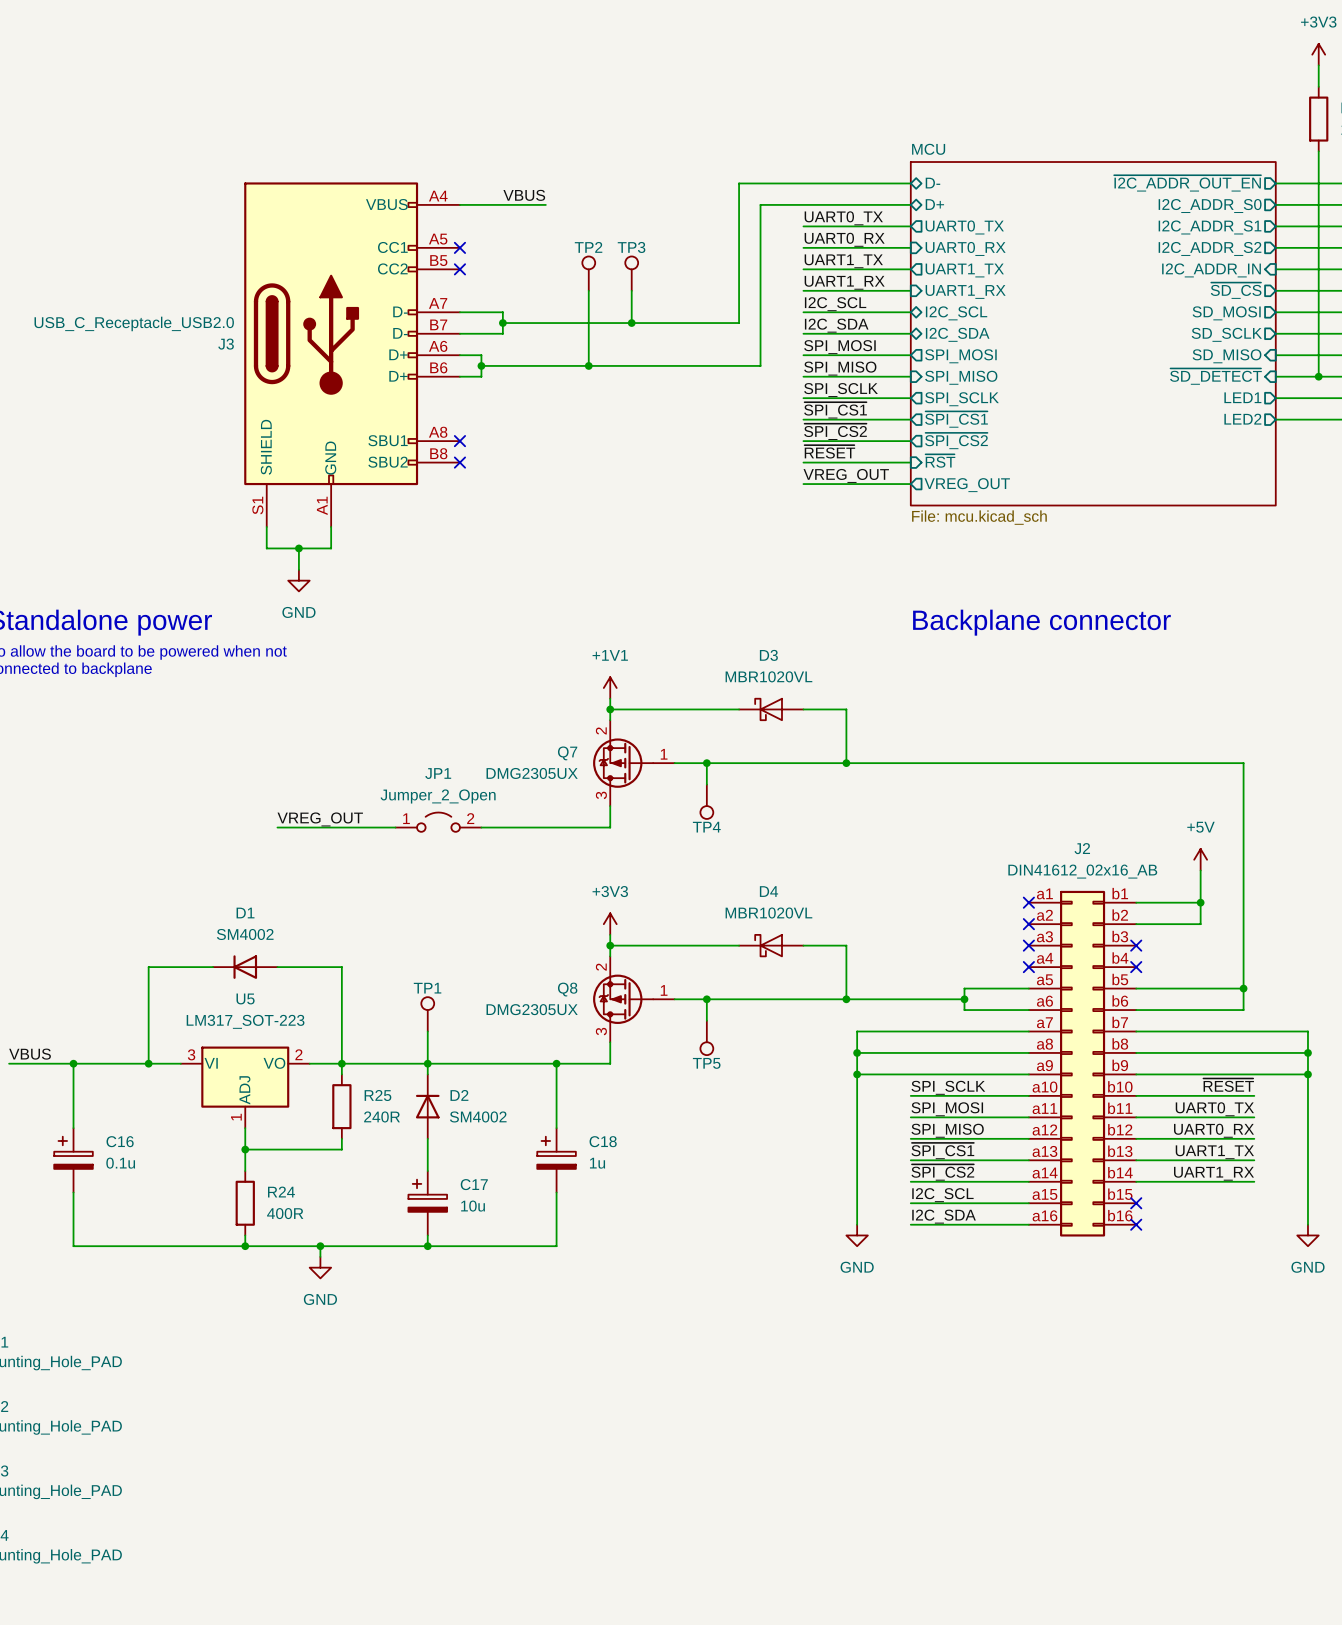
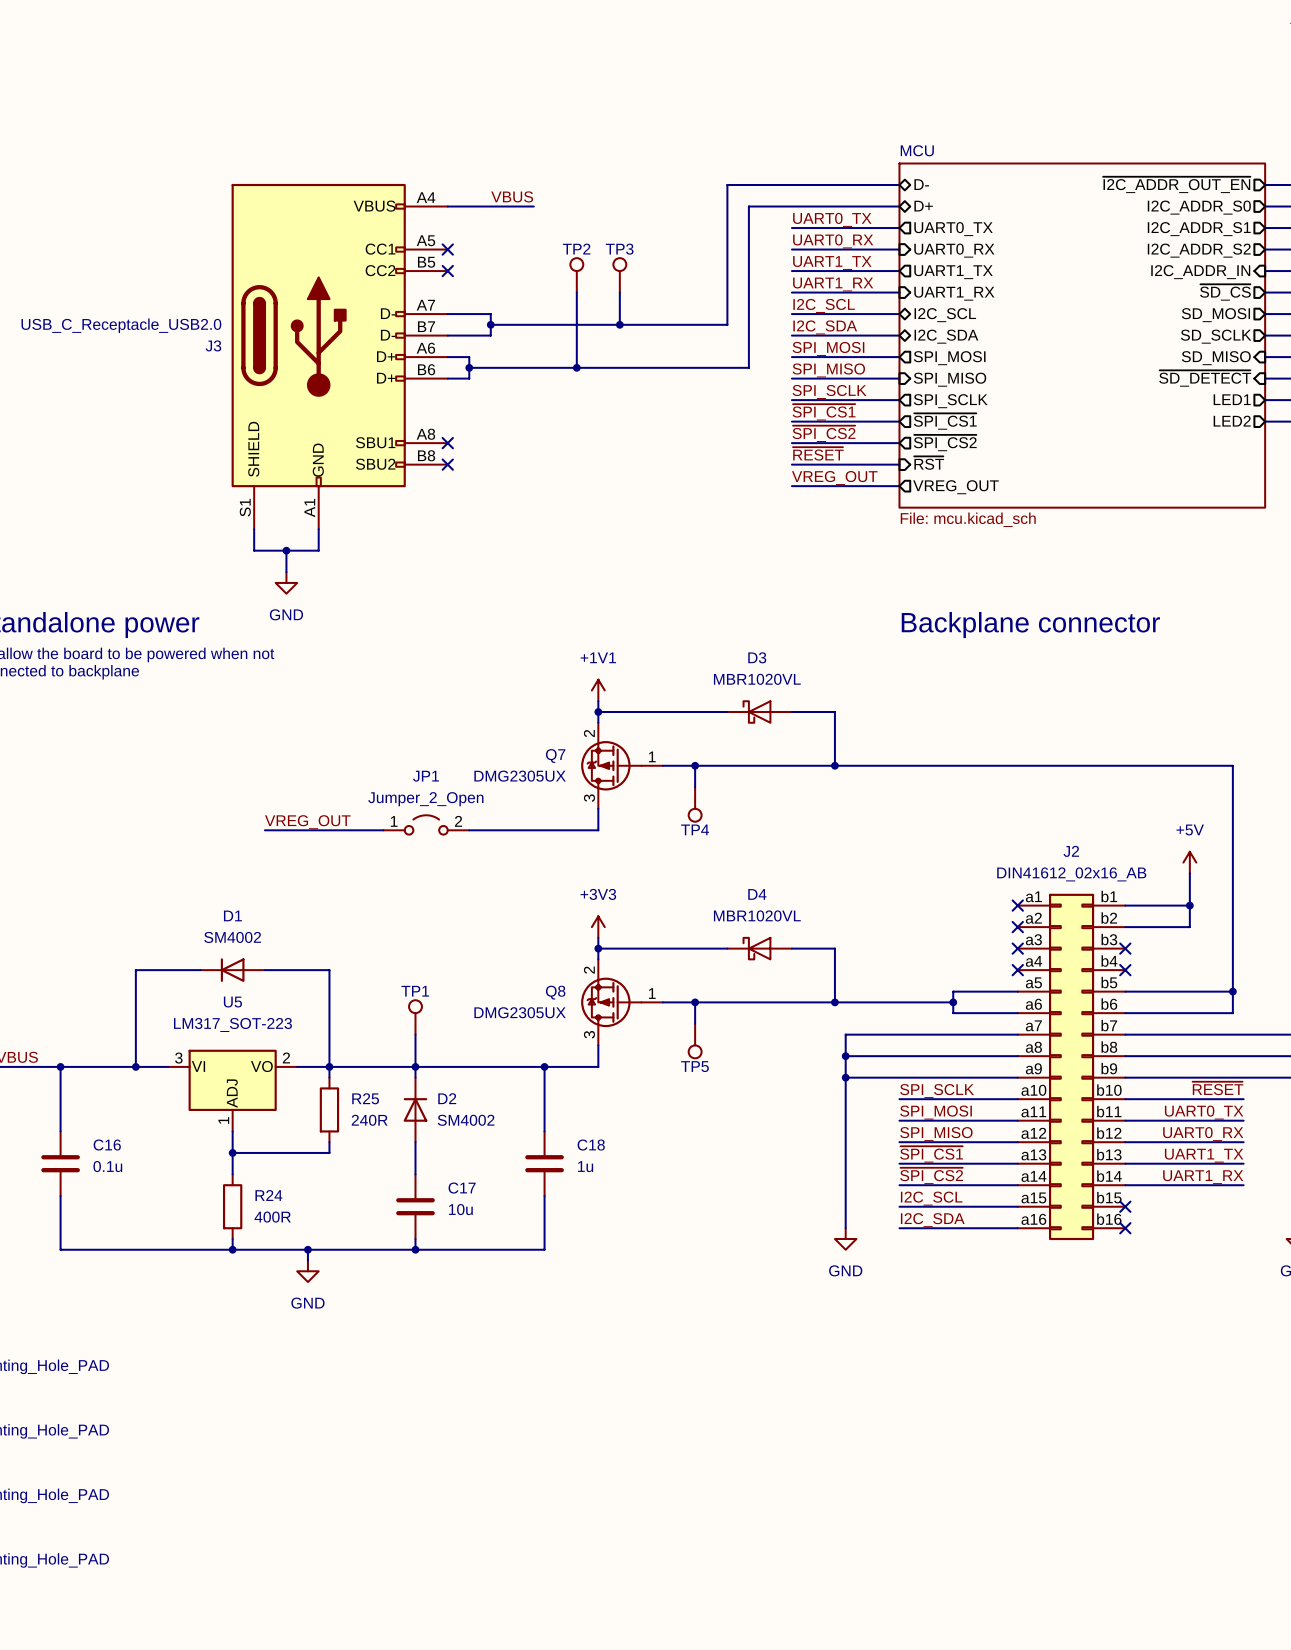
C16 symbol: [54, 1128, 93, 1193] -> [41, 1131, 80, 1196]
C18 symbol: [537, 1128, 576, 1193] -> [525, 1131, 564, 1196]
C17 symbol: [408, 1171, 448, 1236] -> [396, 1174, 435, 1240]

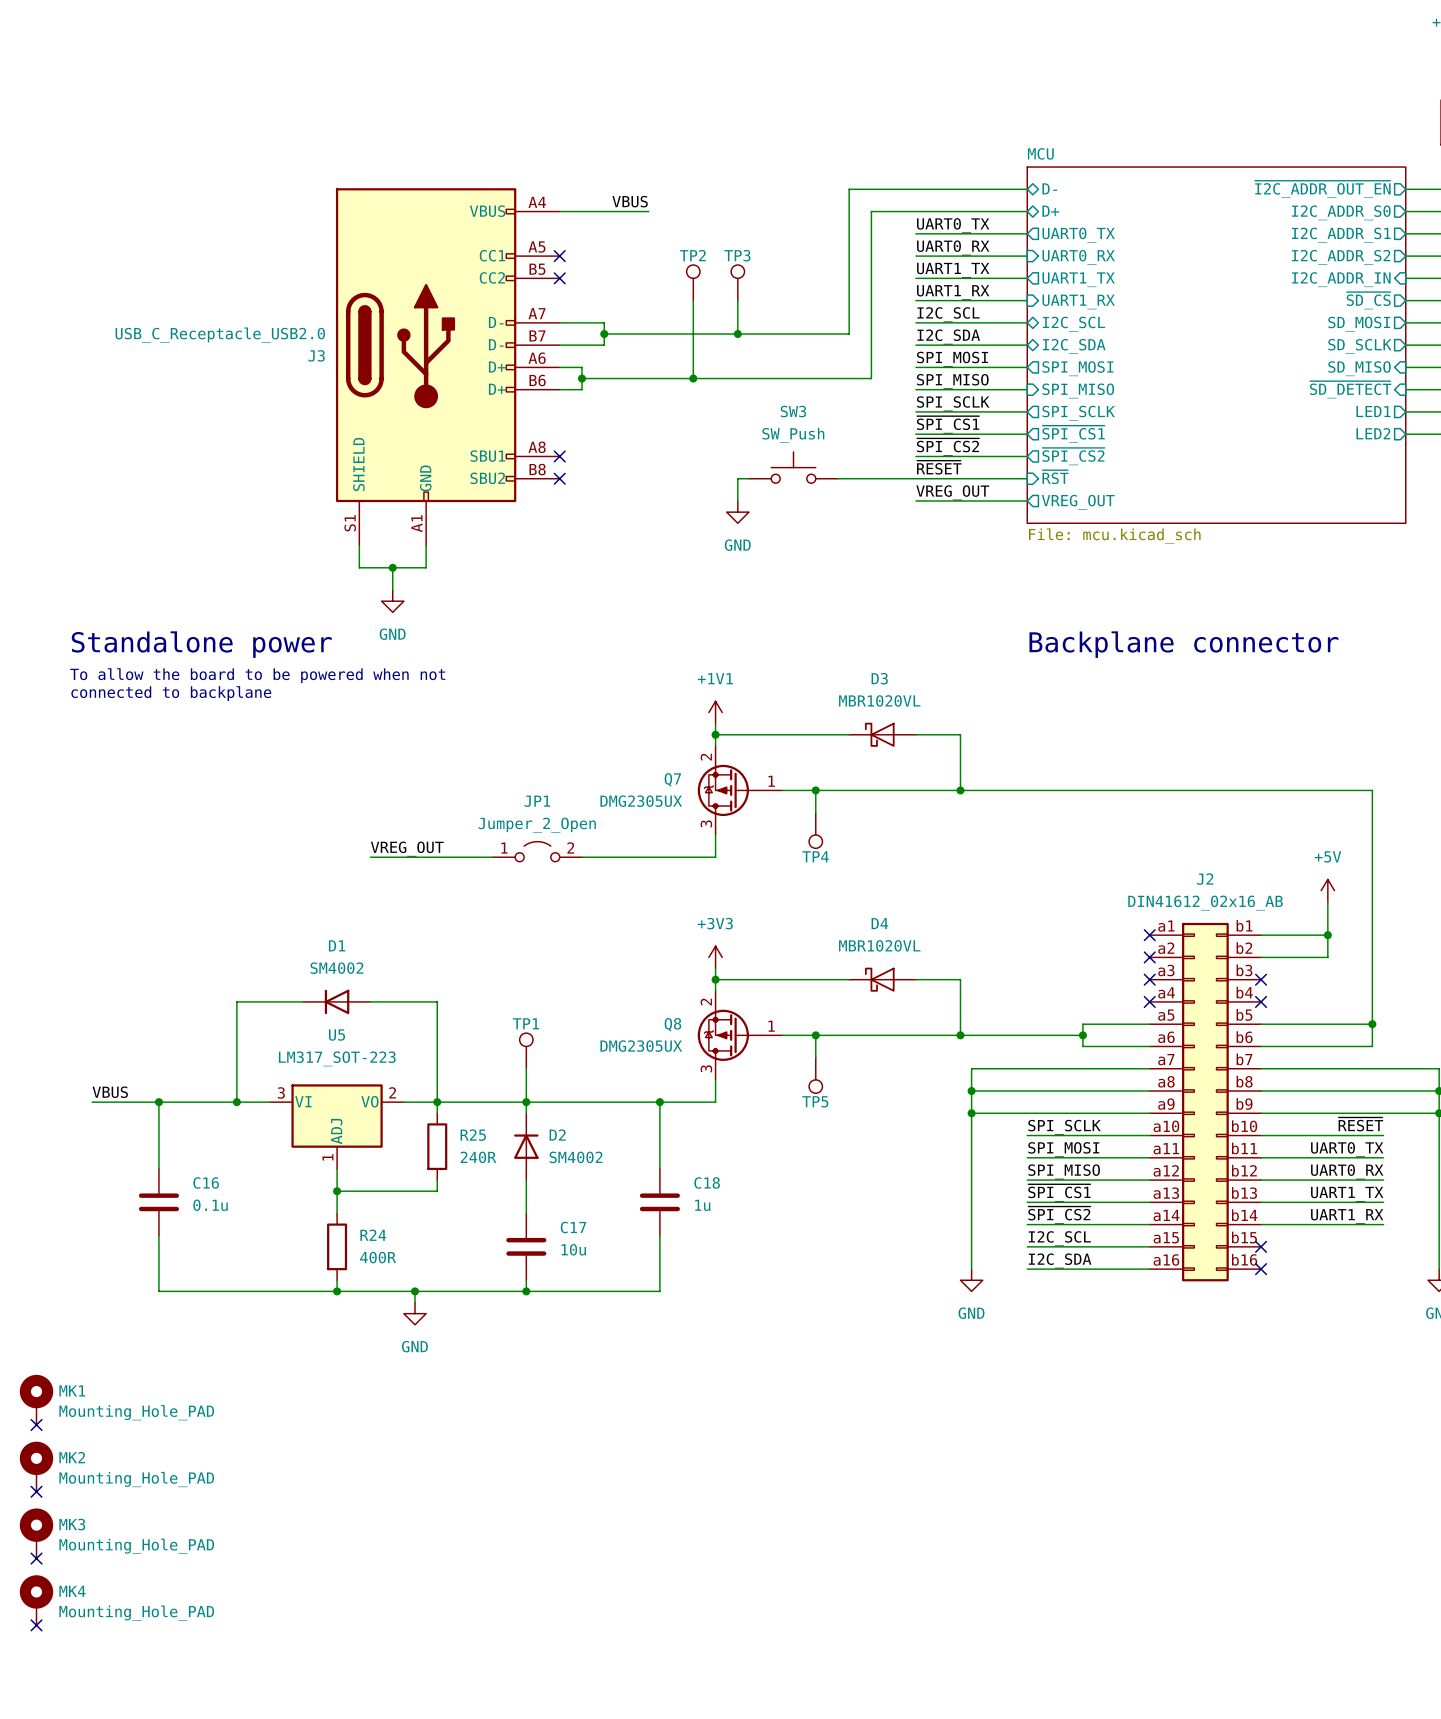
SW3: none -> SW_Push (793, 467)
wire: none -> (748, 478) (737, 478) (737, 501)
wire: none -> (838, 478) (915, 478)
power symbol: none -> GND (737, 512)

